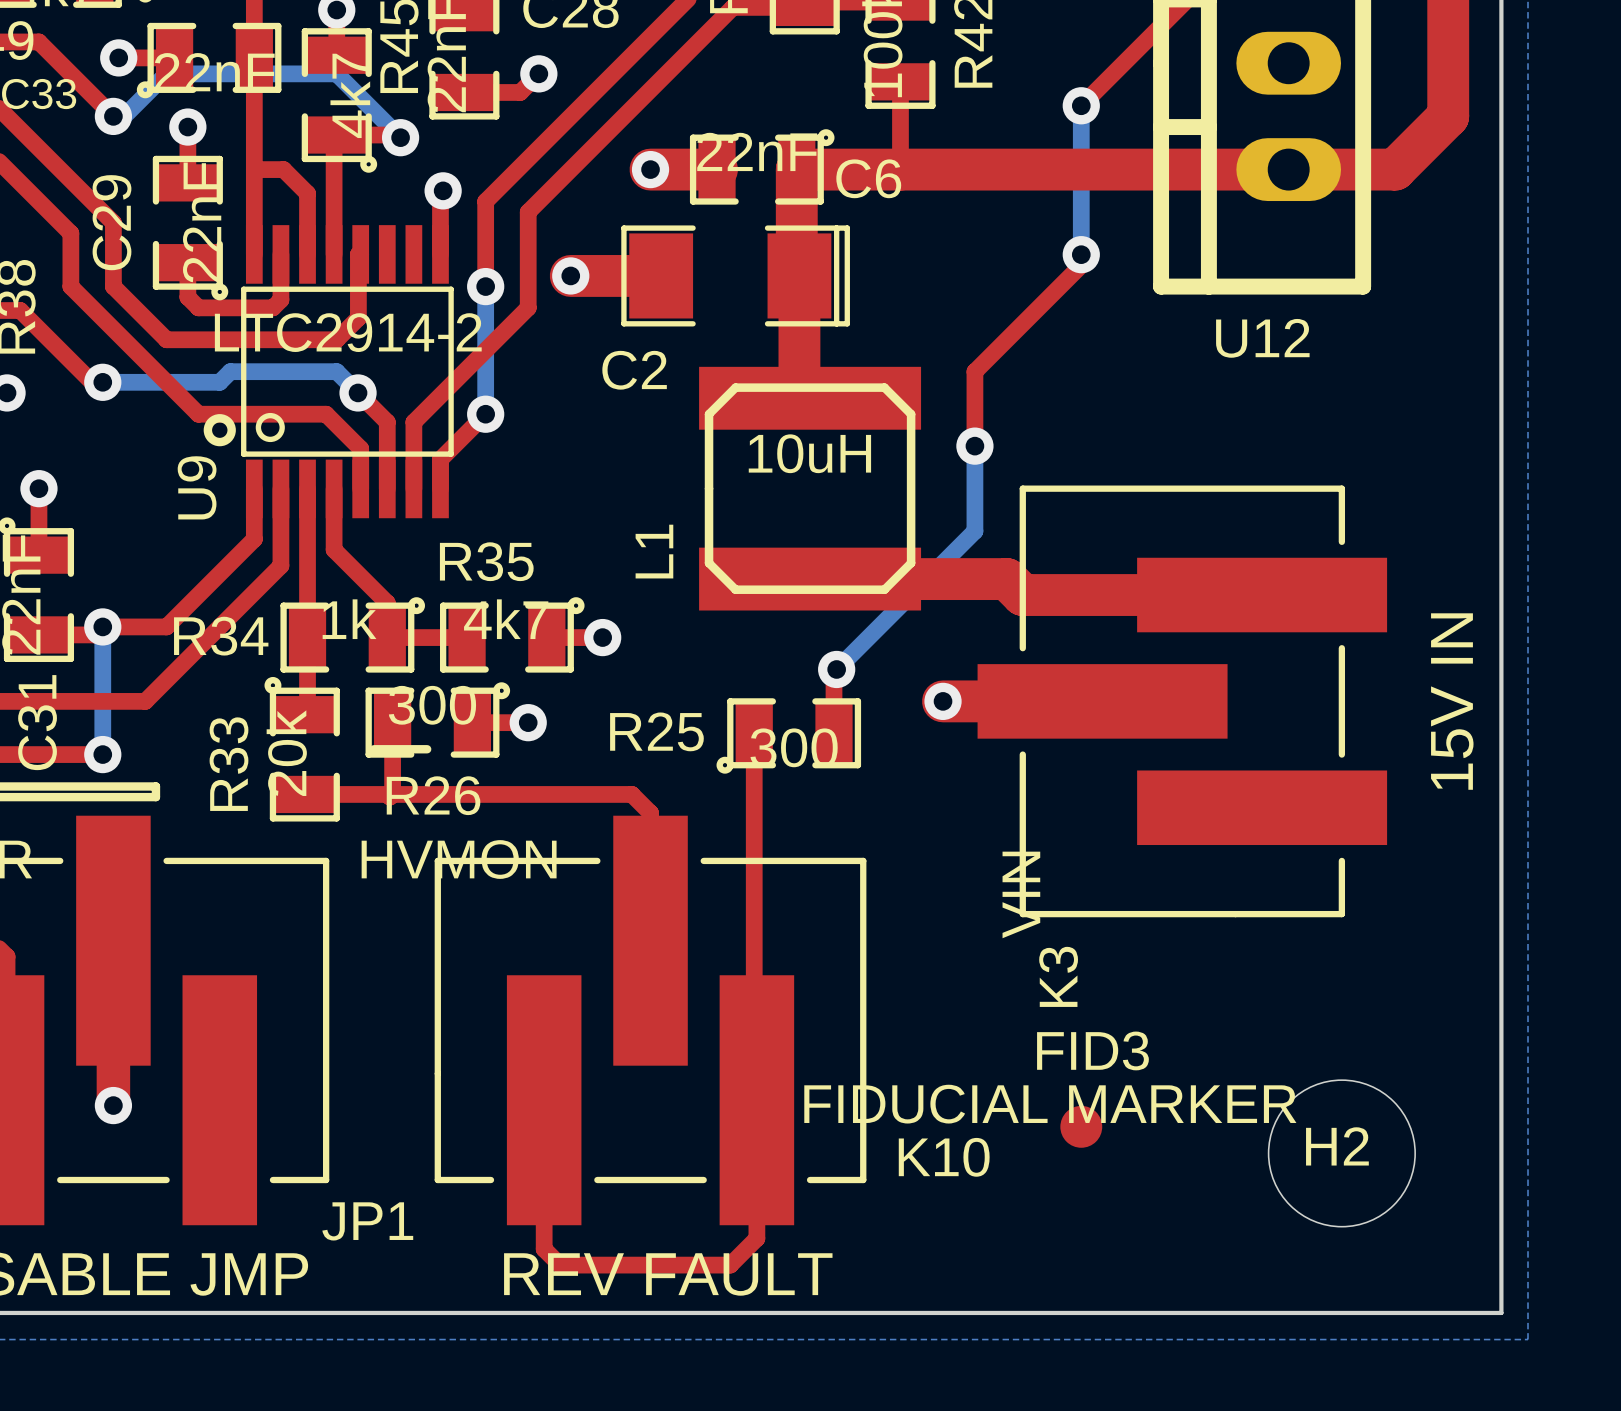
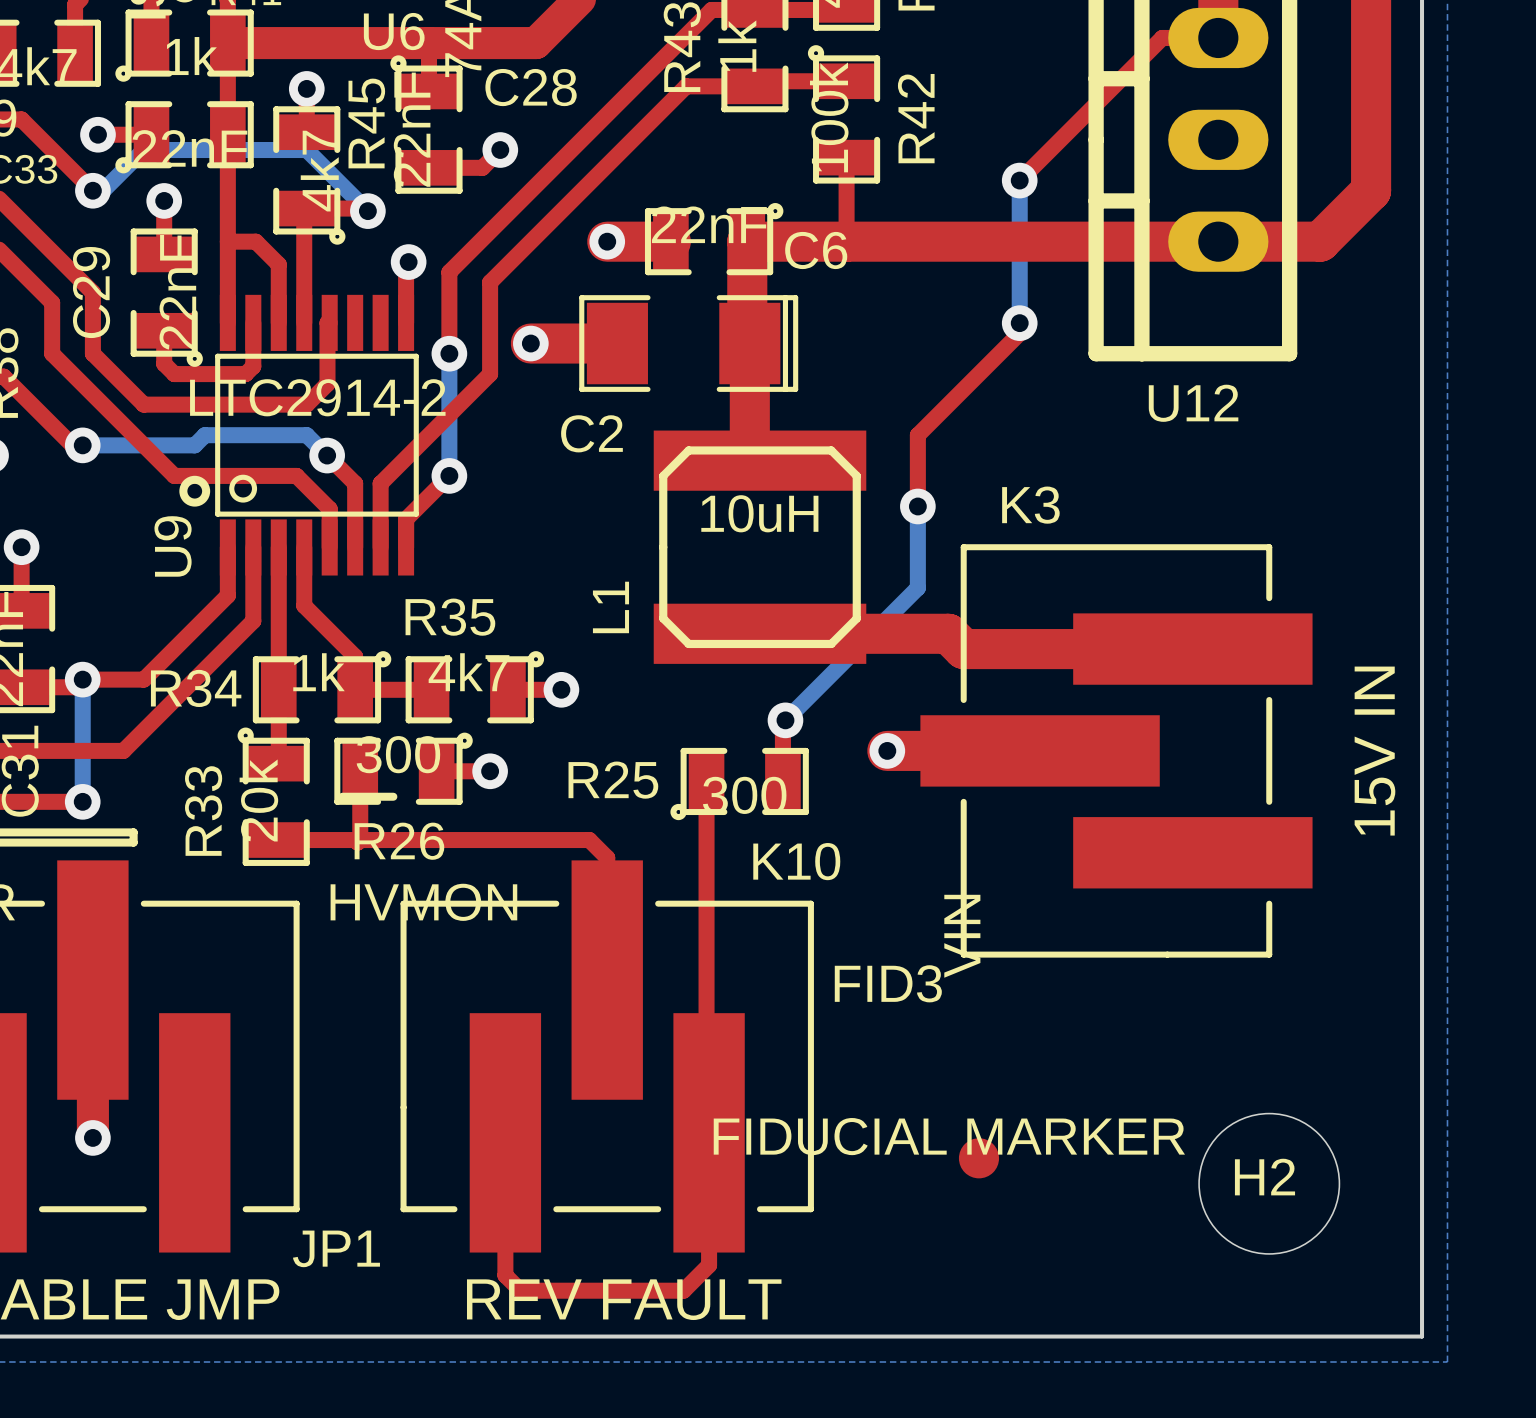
K3 name rotation: 0° (1058, 976) -> 90° clockwise (1030, 505)
K3 name position: K3 (1058, 976) -> K3 (1030, 505)
FID3 name position: FID3 (1092, 1050) -> FID3 (888, 983)
FID3 position: (1081, 1126) -> (978, 1158)
K10 name position: K10 (944, 1157) -> K10 (796, 861)

